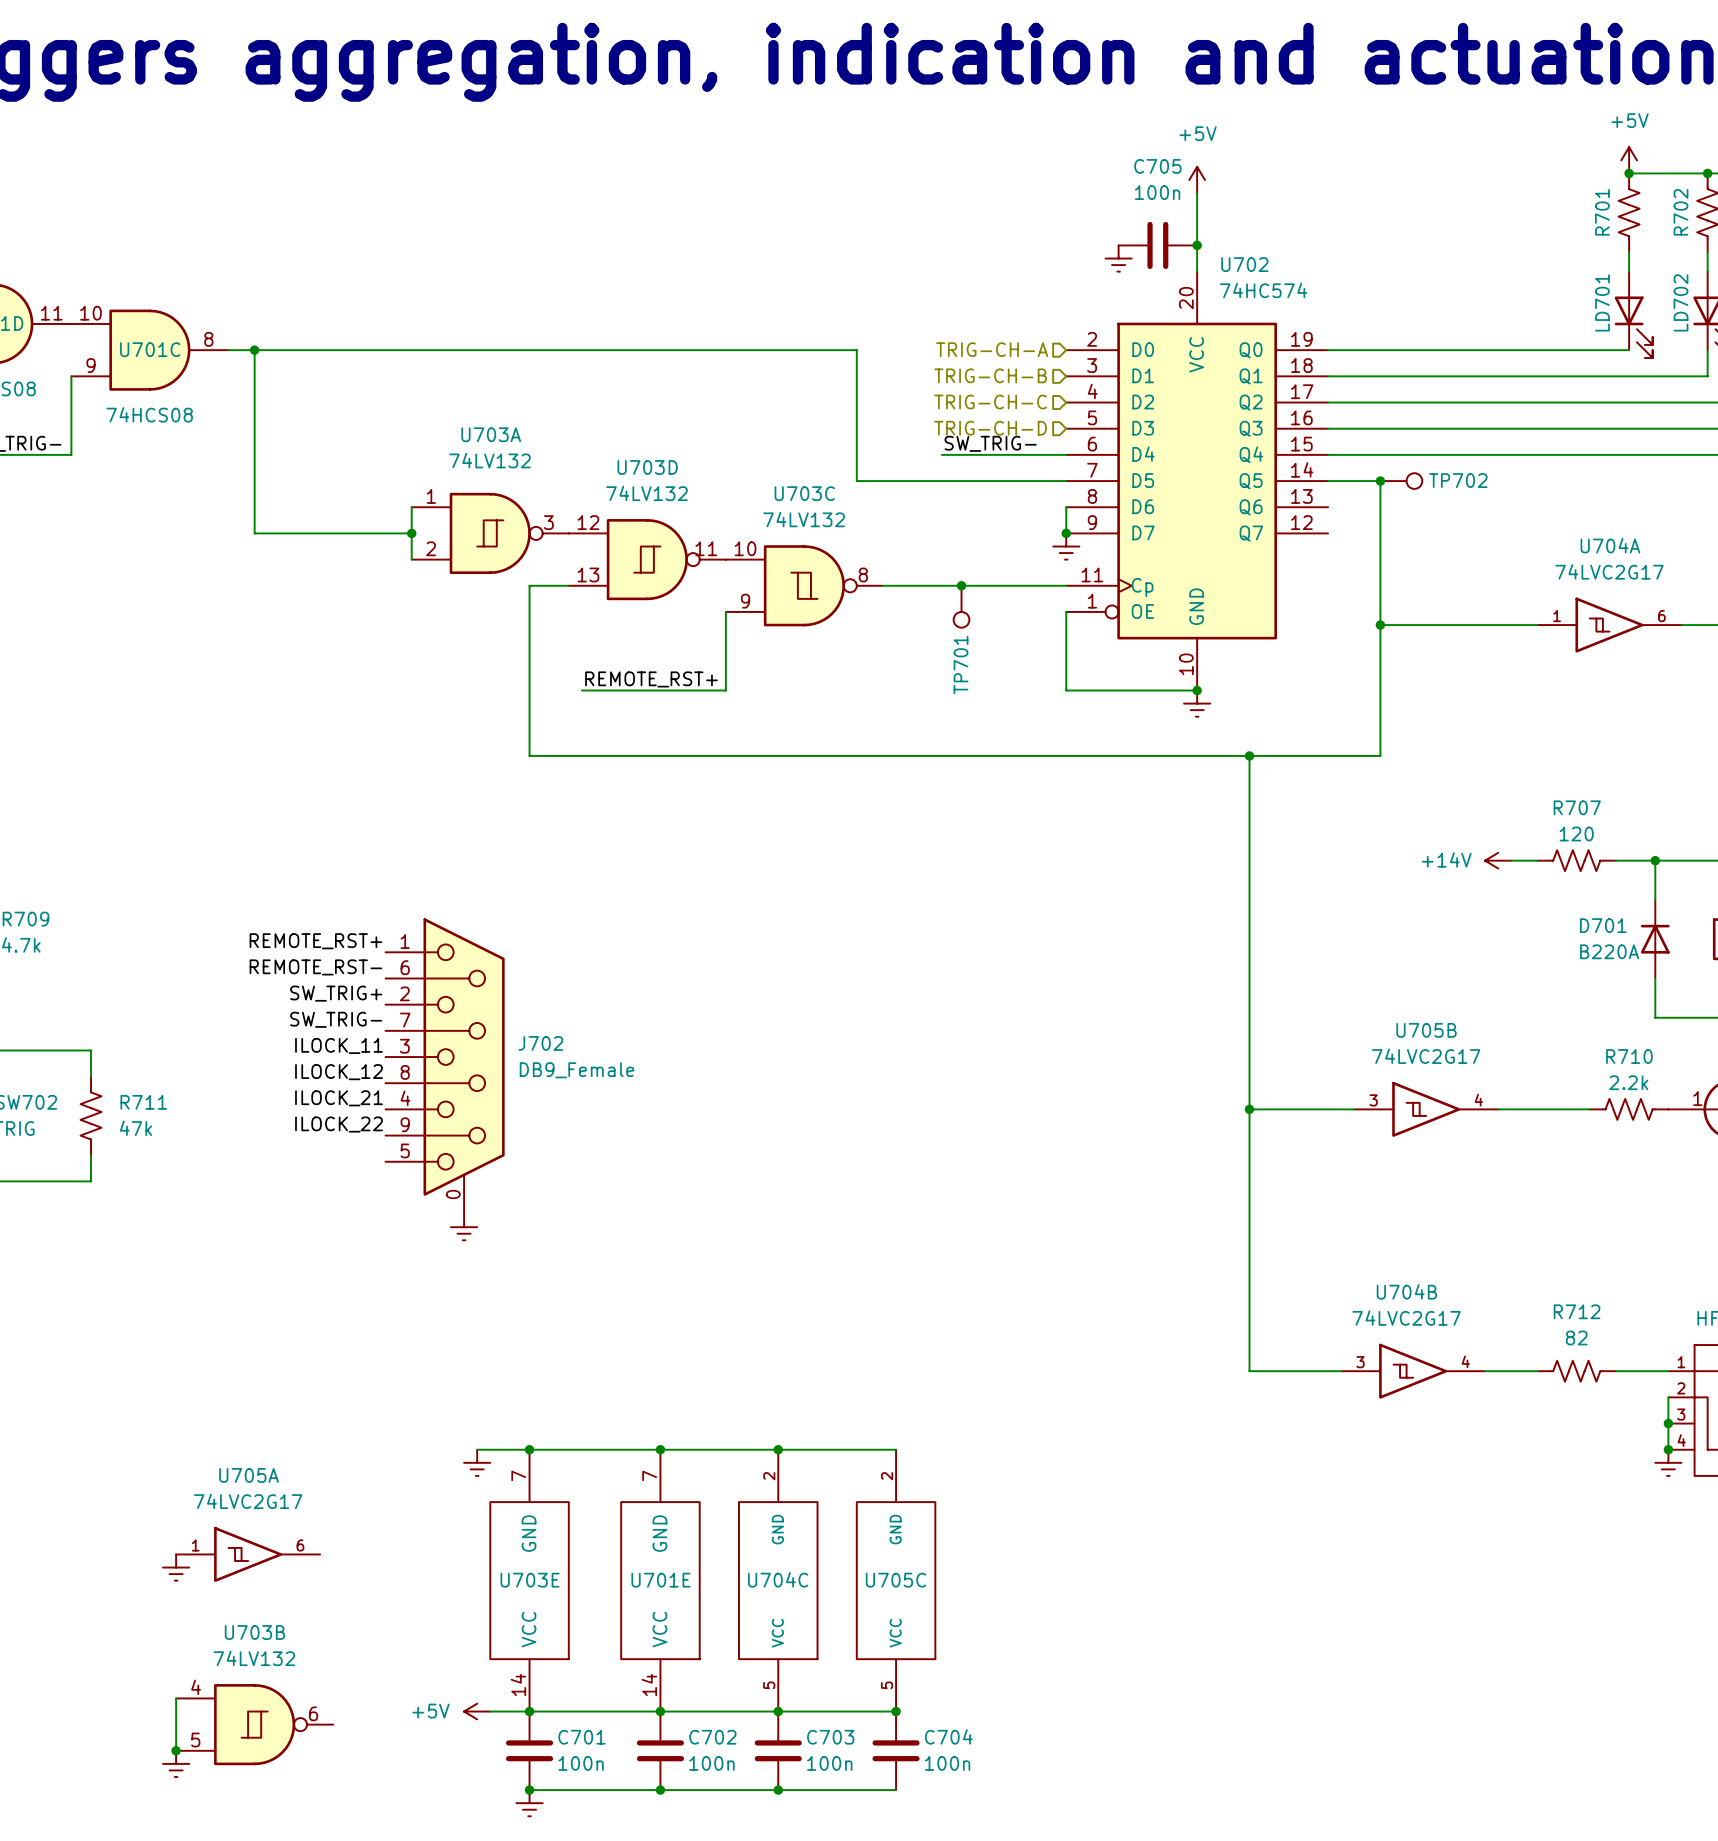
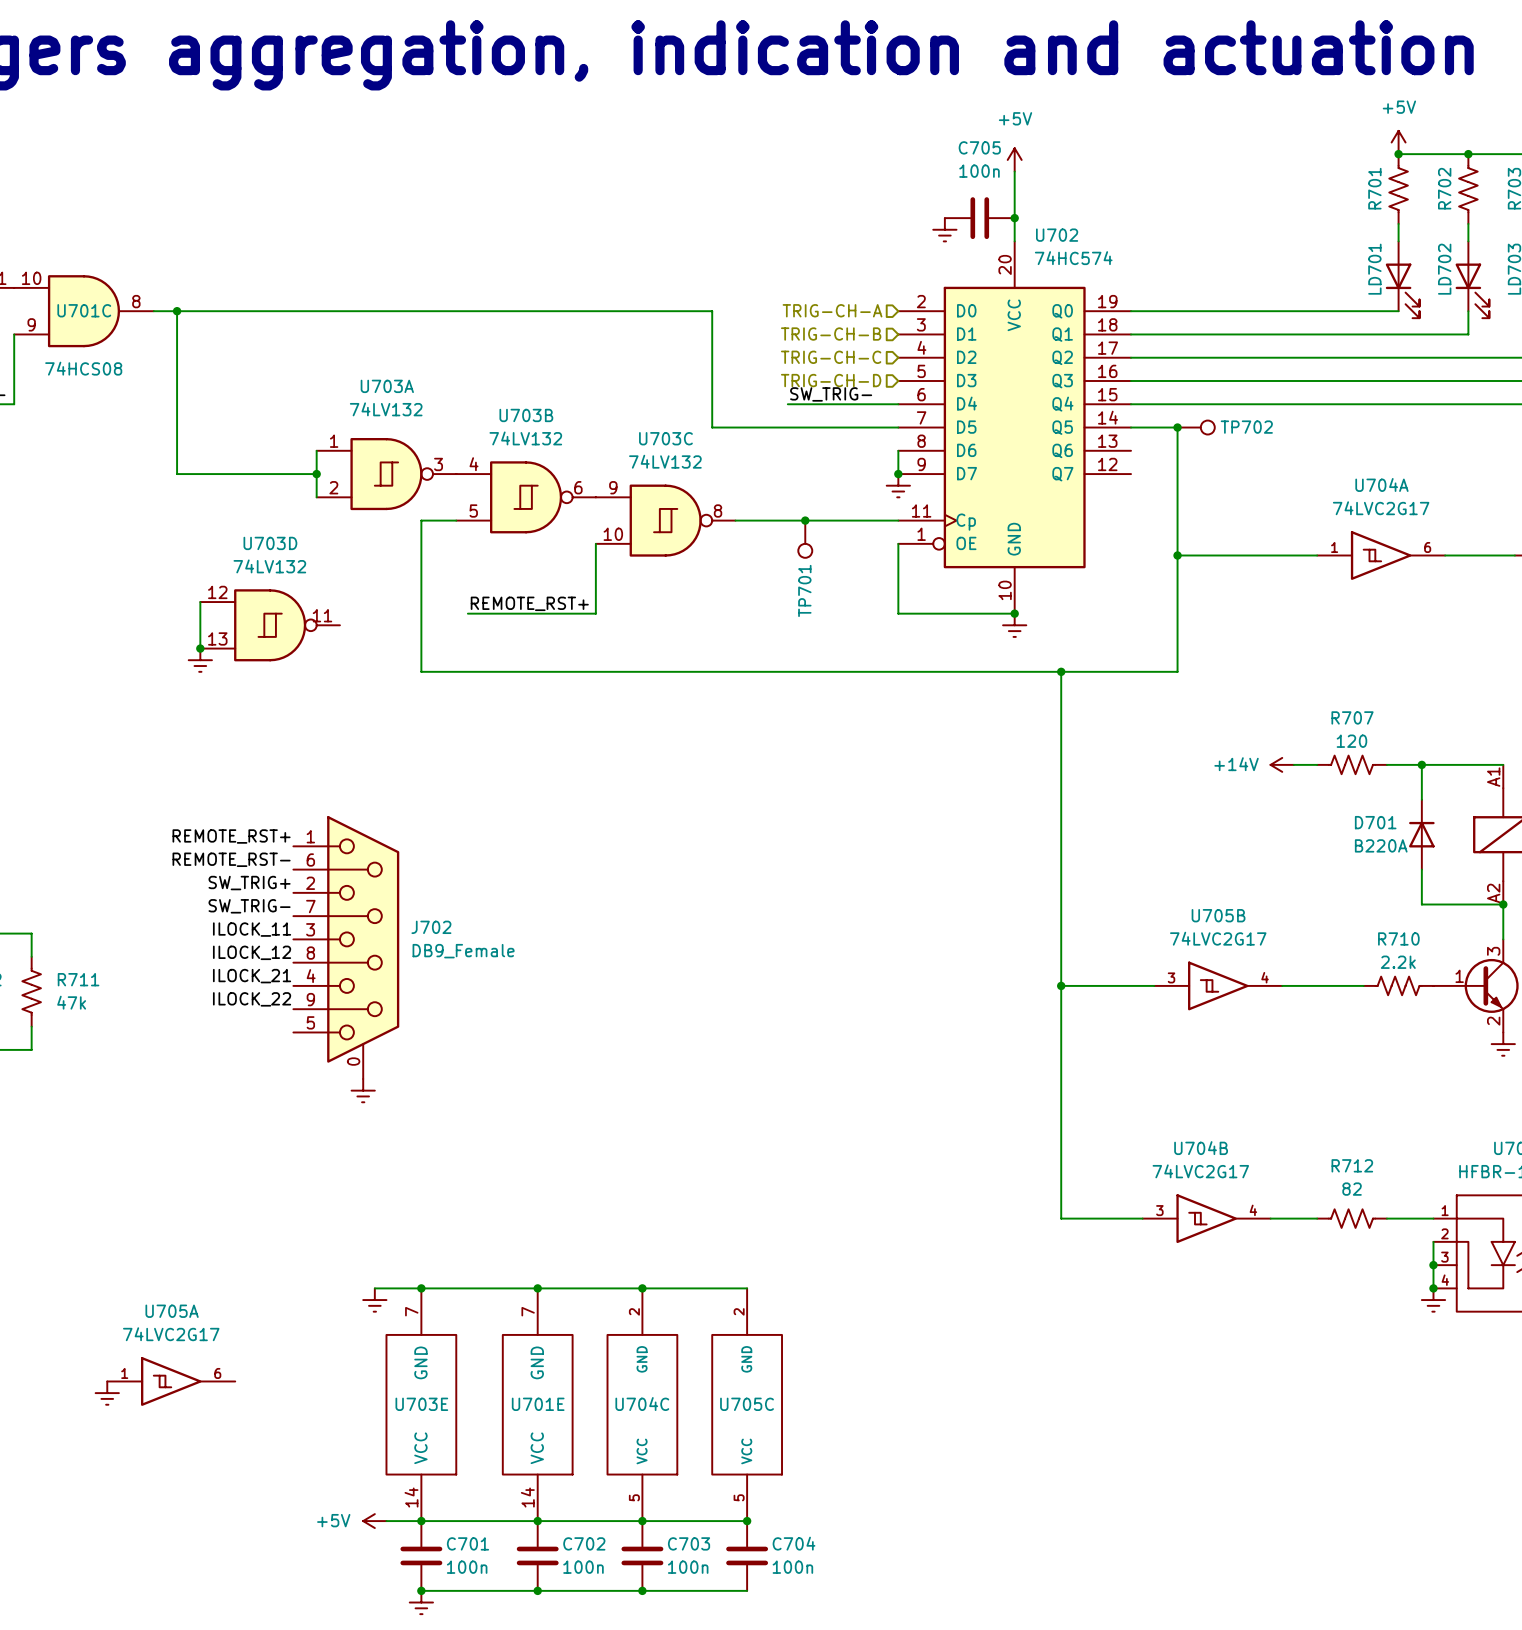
U703D position: (647, 559) -> (270, 625)
U703C flip: as is (804, 585) -> up-down (665, 520)
wire: none -> (200, 602) (200, 648)
junction: none -> (200, 648)
power symbol: none -> (200, 660)
wire: (176, 1698) (176, 1750) -> none
U703B position: (254, 1724) -> (526, 497)
junction: (176, 1750) -> none
power symbol: (176, 1763) -> none

